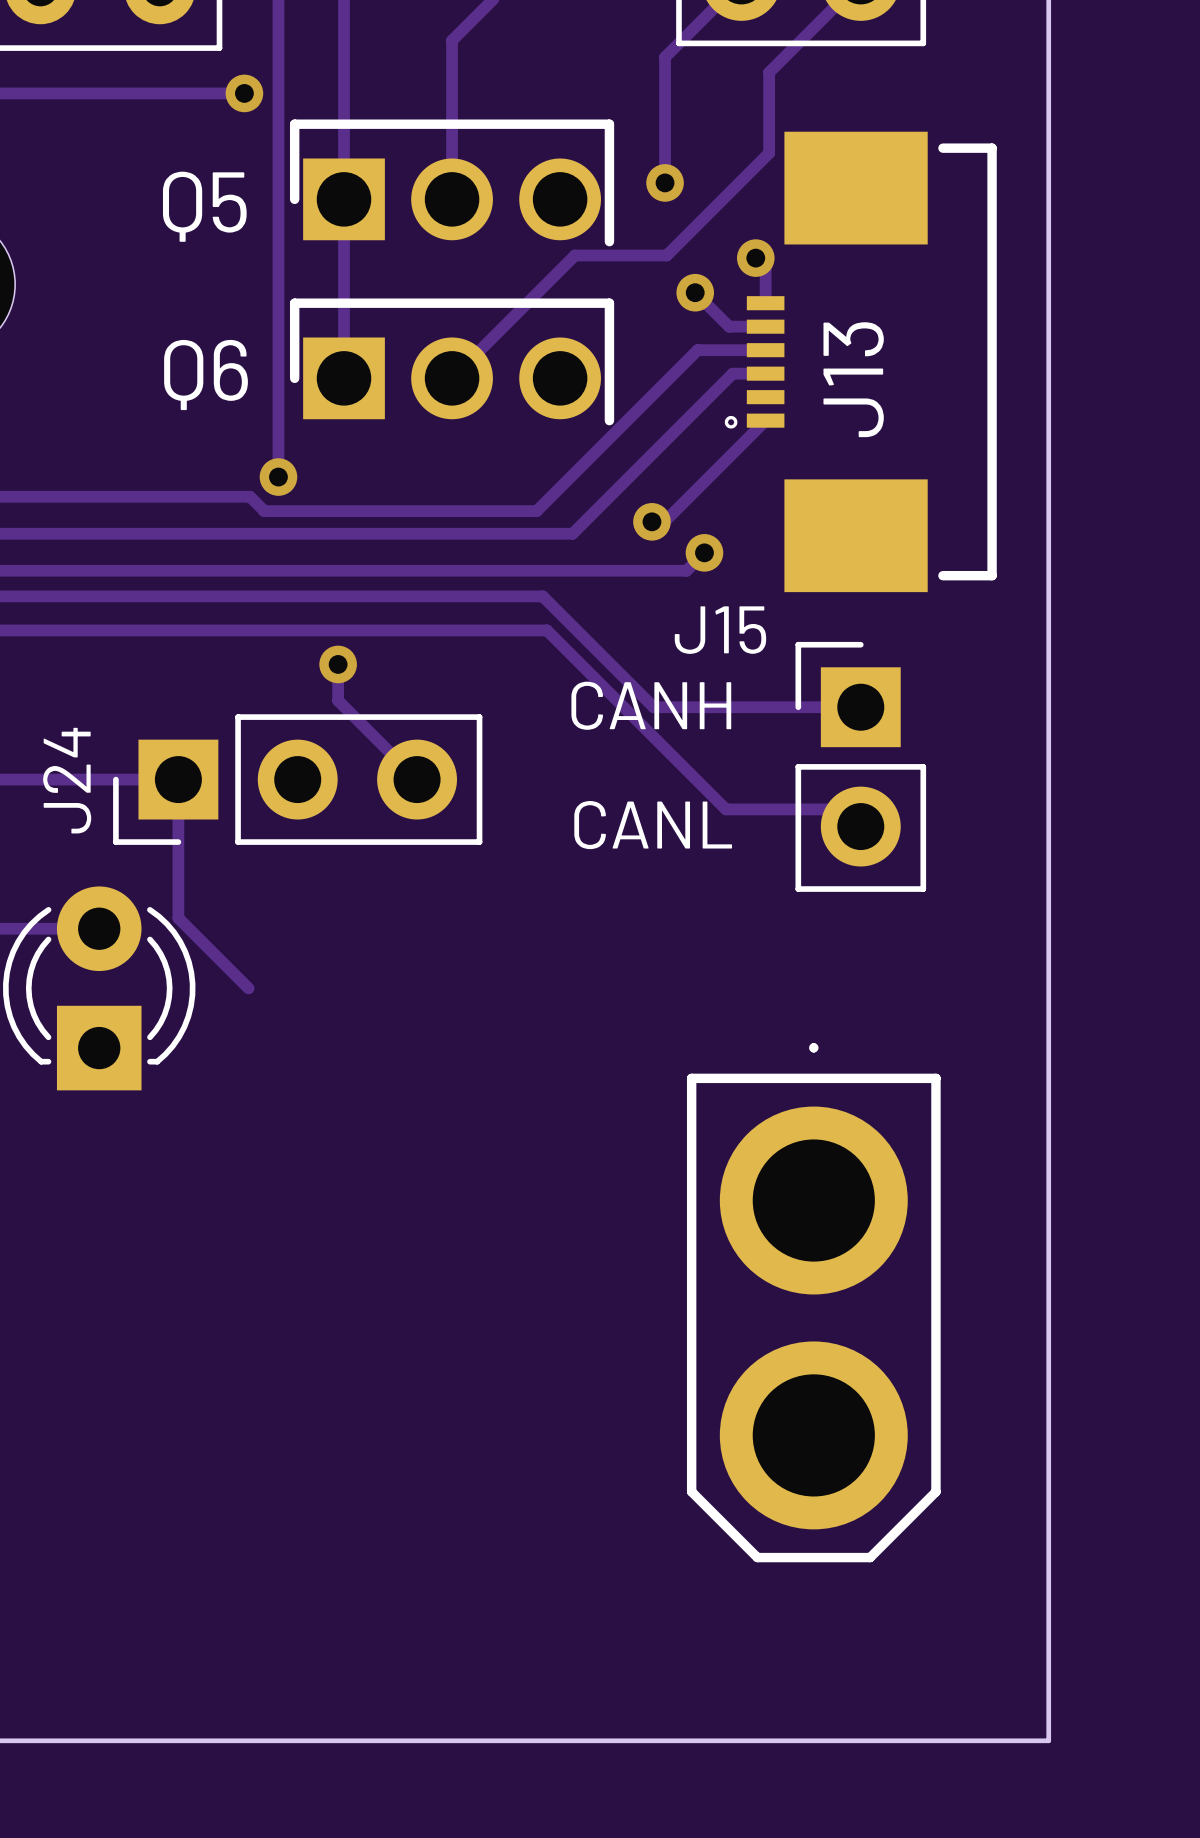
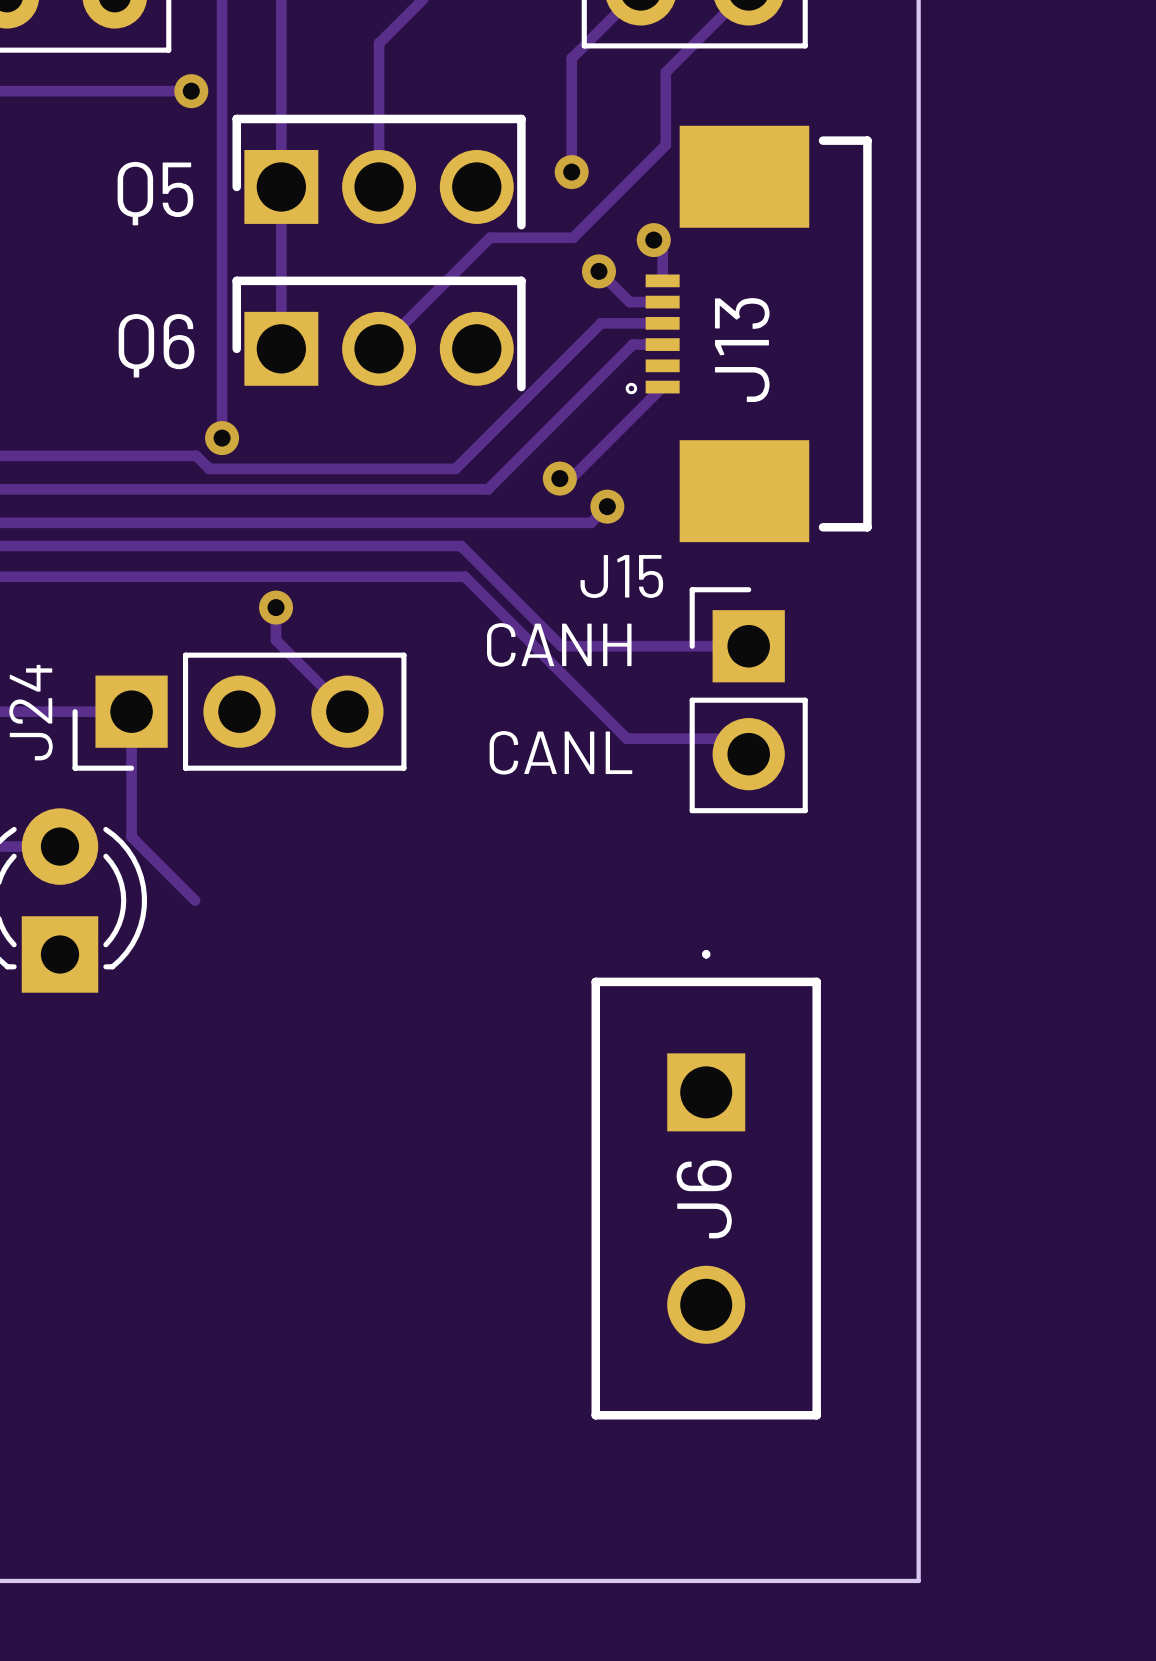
part: (813, 1302) -> none
J6: none -> (706, 1184)

